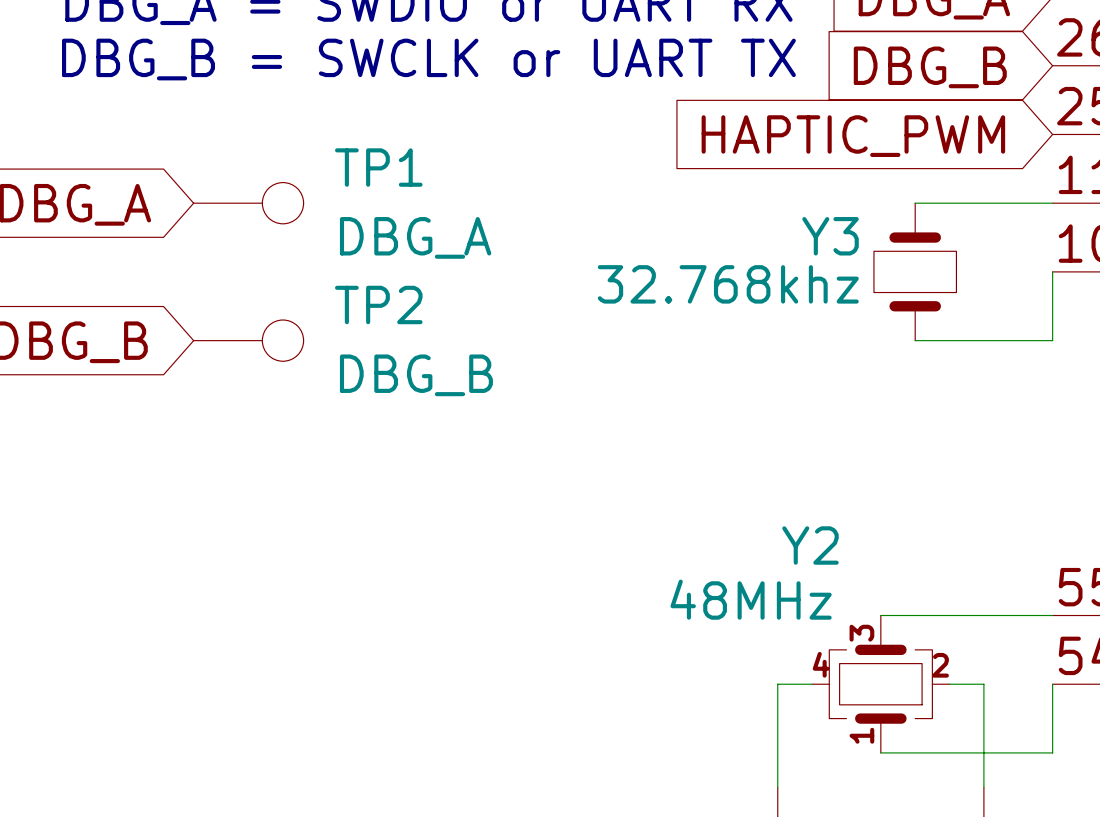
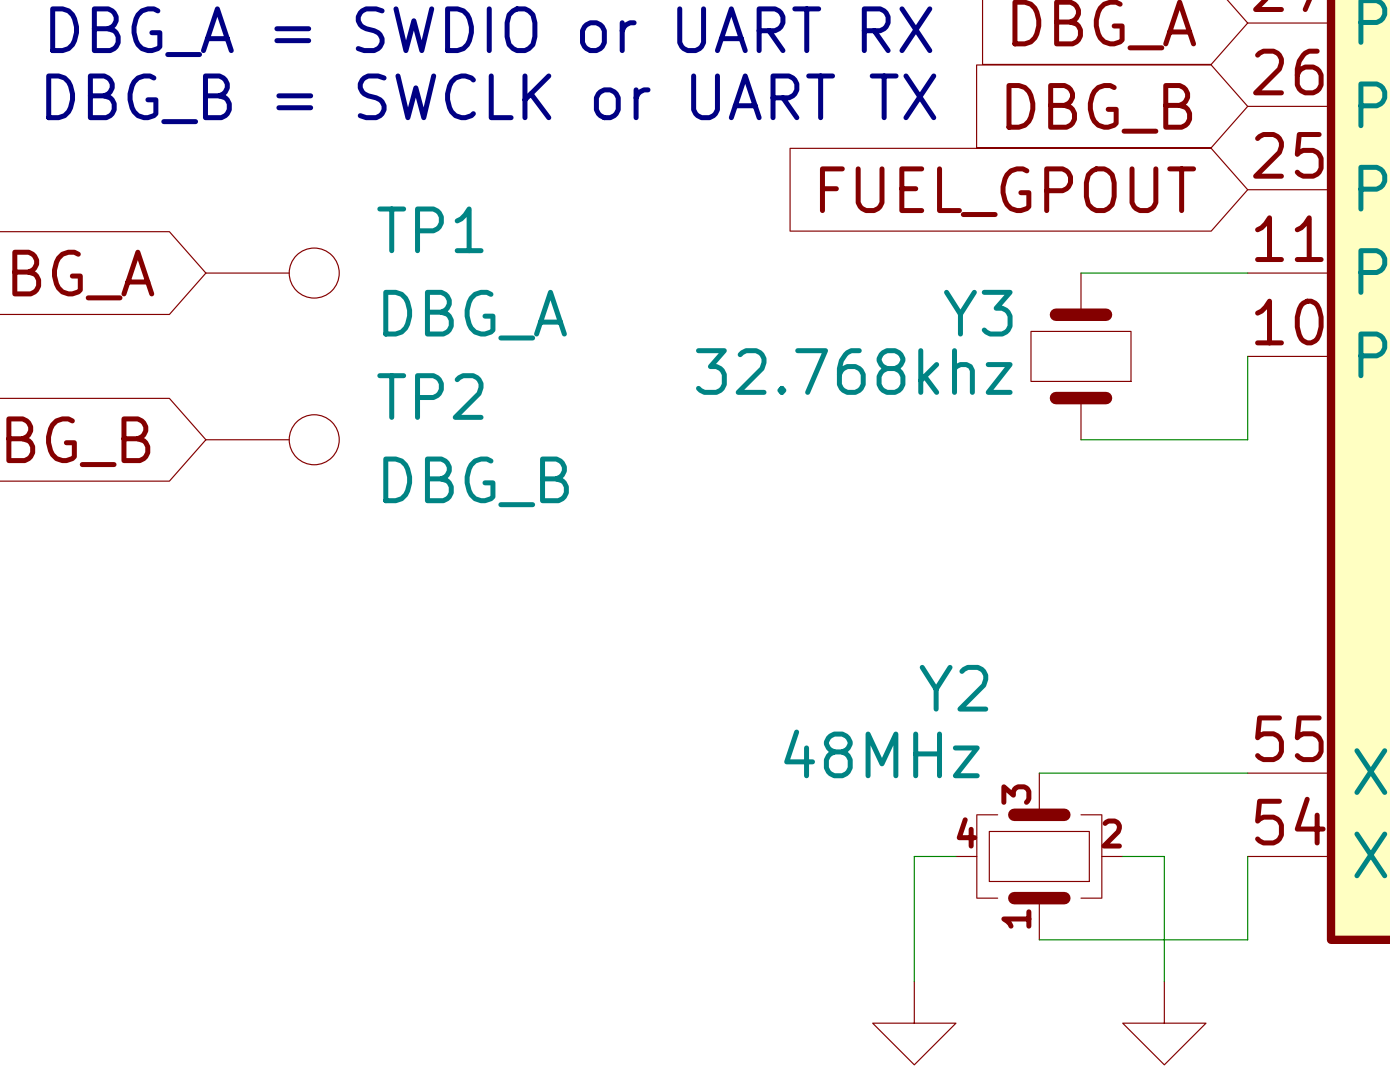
global label: HAPTIC_PWM (853, 136) -> FUEL_GPOUT (1008, 191)

